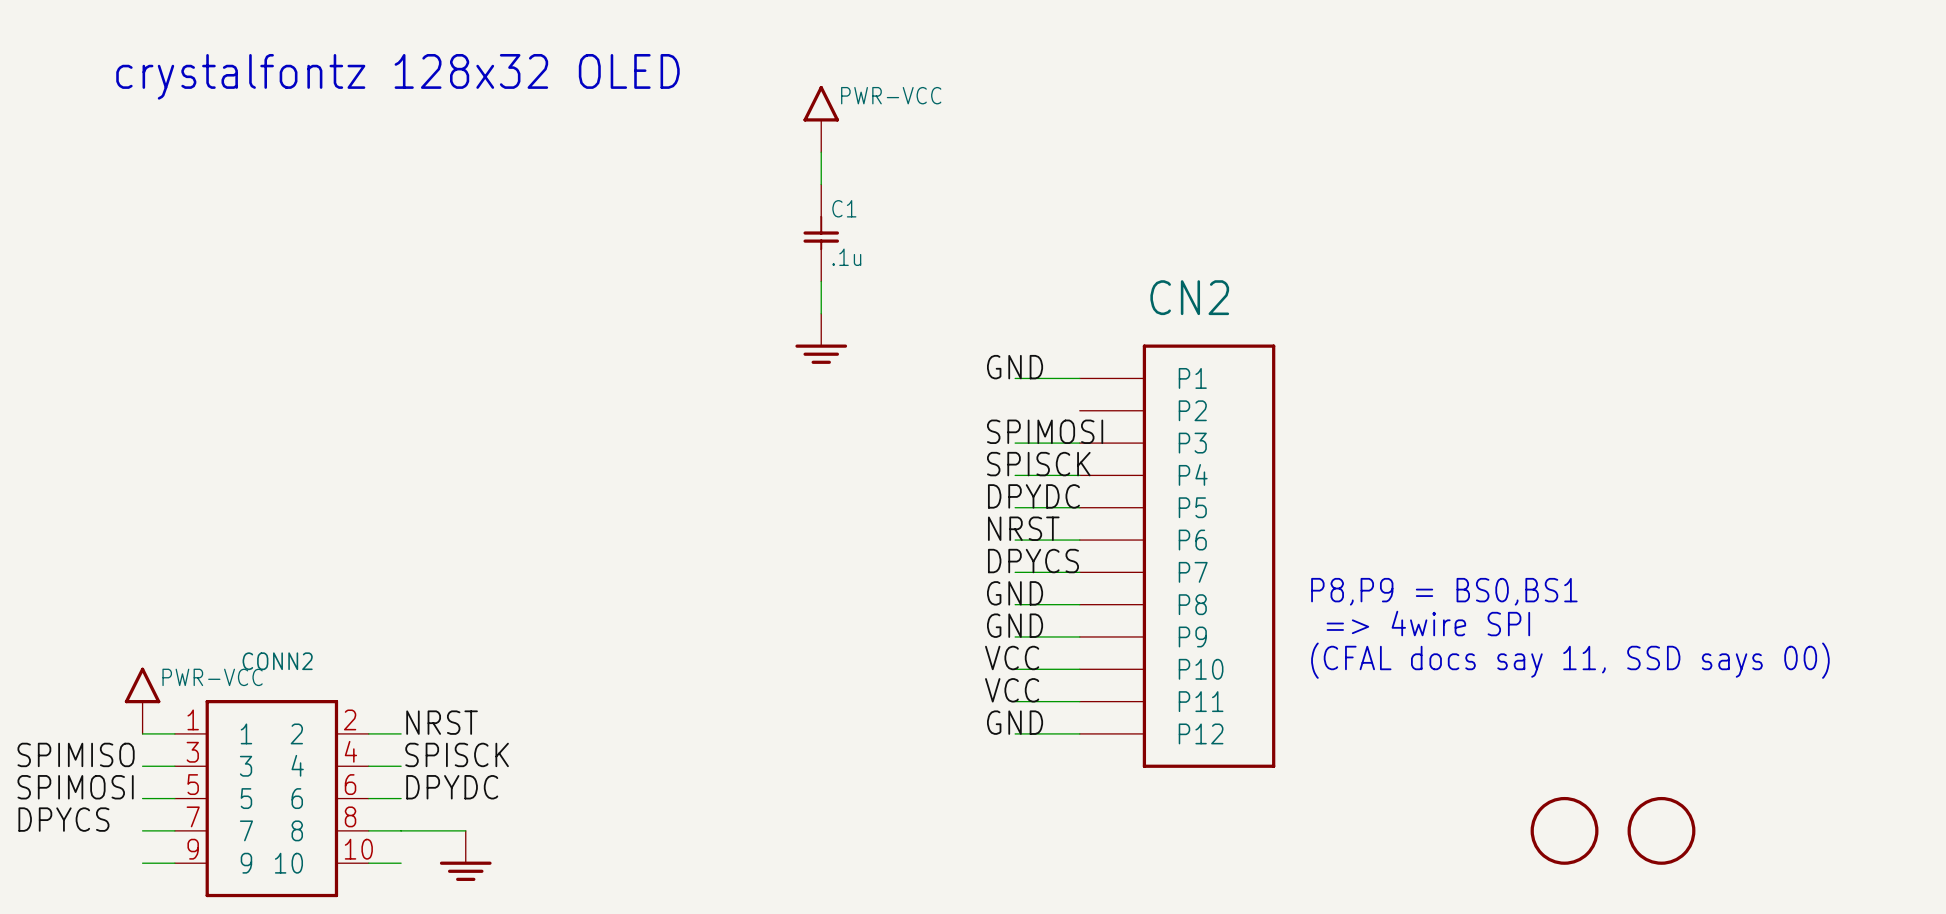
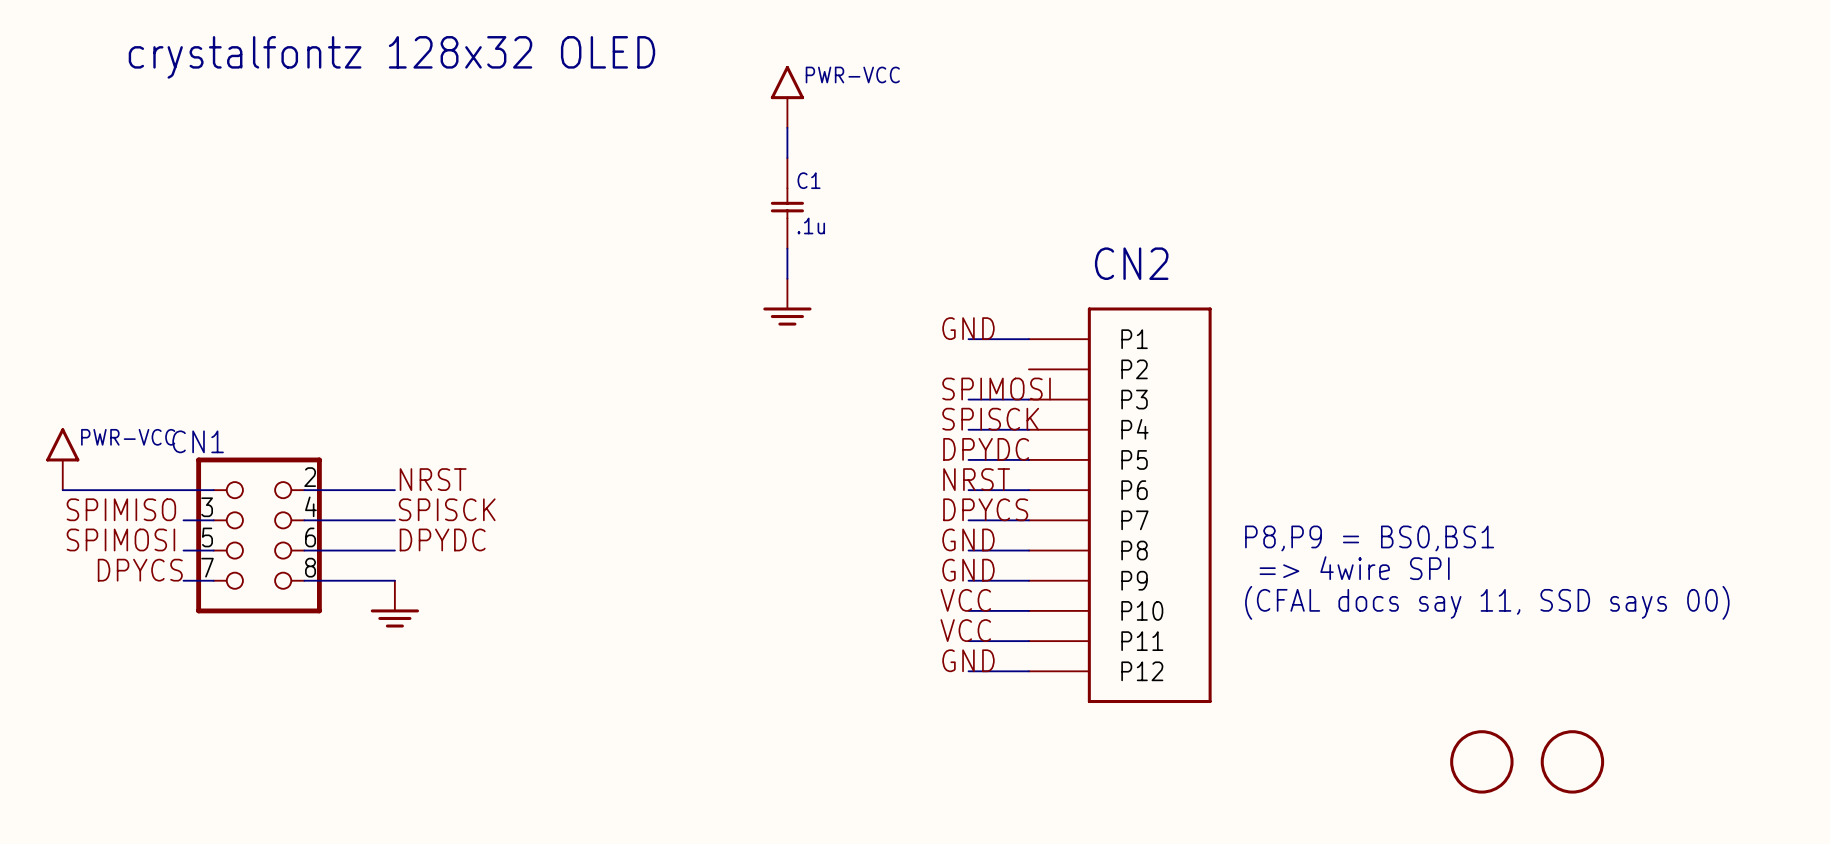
wire: none -> (62, 490) (213, 490)
wire: none -> (304, 490) (394, 490)
wire: none -> (304, 520) (394, 520)
CN1: none -> (259, 535)
wire: none -> (304, 550) (394, 550)
power symbol position: PWR-VCC (142, 700) -> PWR-VCC (62, 459)
label position: NRST (442, 722) -> NRST (433, 479)
wire: (142, 733) (174, 733) -> (183, 520) (213, 520)
wire: (368, 733) (401, 733) -> none
label position: SPIMISO (76, 754) -> SPIMISO (121, 509)
label position: SPISCK (457, 754) -> SPISCK (447, 509)
wire: (142, 766) (174, 766) -> (183, 550) (213, 550)
wire: (368, 766) (401, 766) -> none
label position: SPIMOSI (75, 787) -> SPIMOSI (120, 539)
label position: DPYDC (452, 787) -> DPYDC (442, 539)
wire: (142, 798) (174, 798) -> (183, 580) (213, 580)
CONN2: (271, 798) -> none
wire: (368, 798) (401, 798) -> none
label position: DPYCS (63, 819) -> DPYCS (140, 570)
wire: (142, 830) (174, 830) -> none
wire: (368, 830) (465, 830) -> (304, 580) (394, 580)
power symbol position: (465, 855) -> (394, 604)
wire: (142, 863) (174, 863) -> none
wire: (368, 863) (401, 863) -> none

